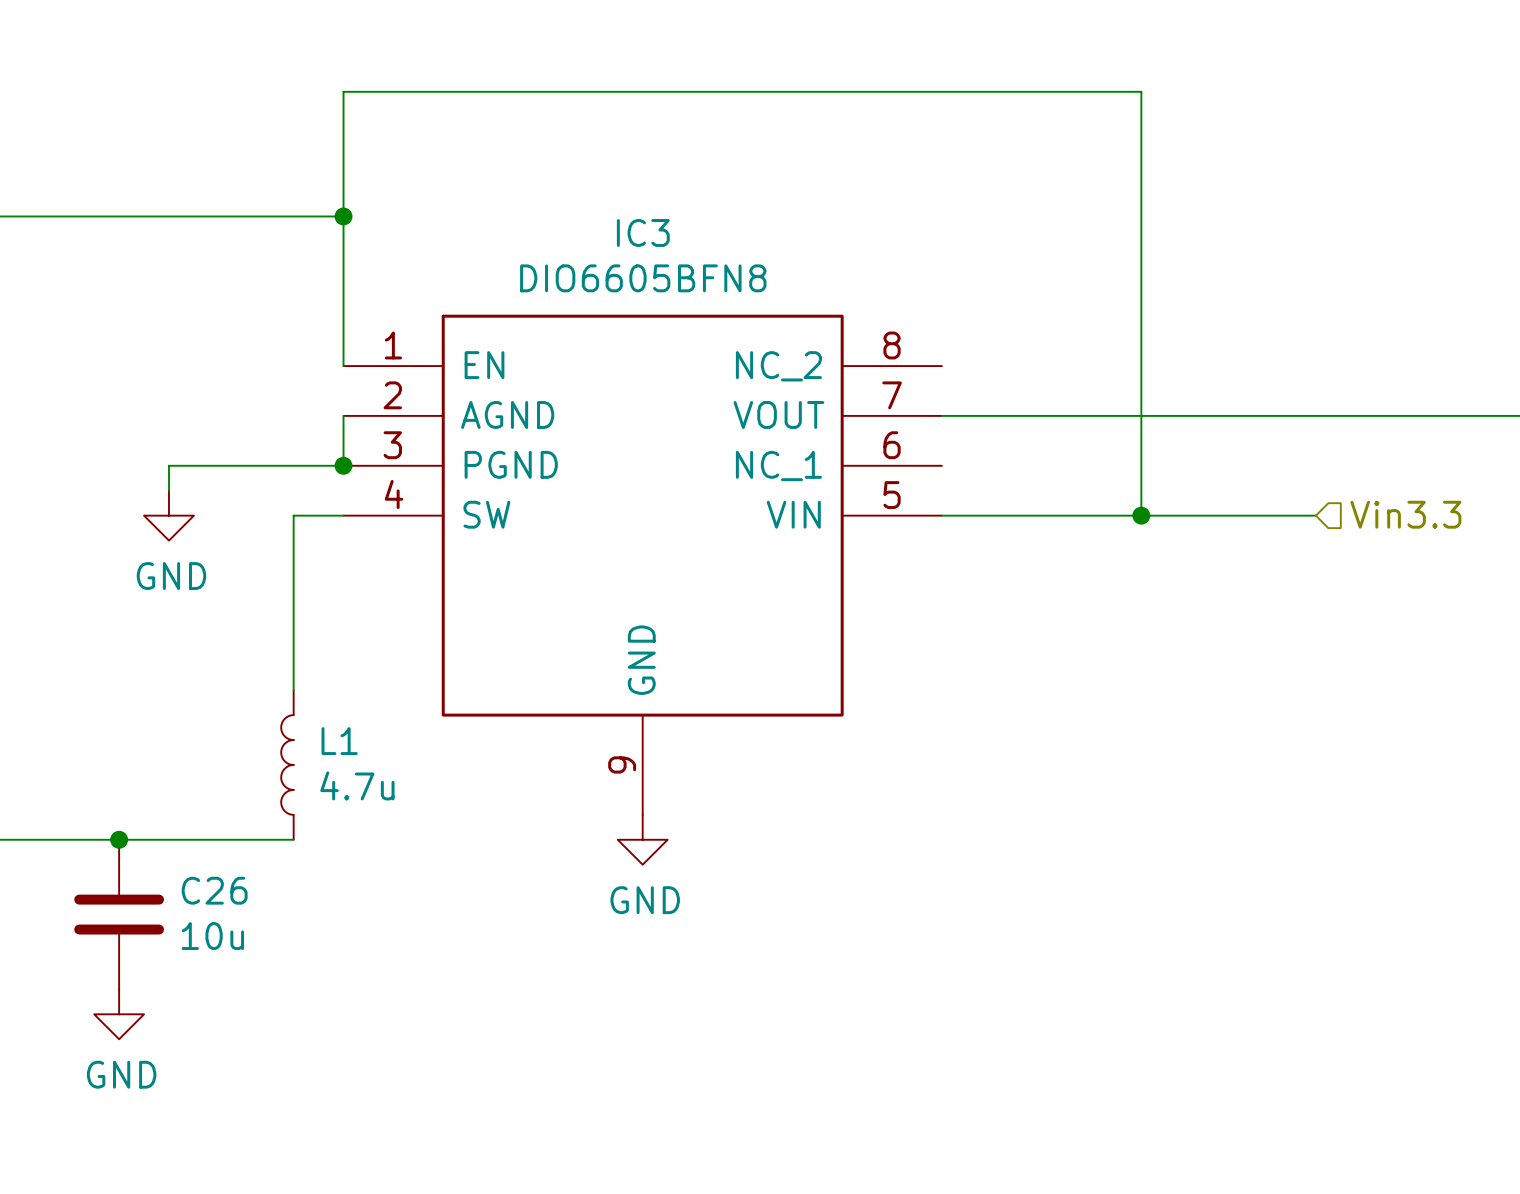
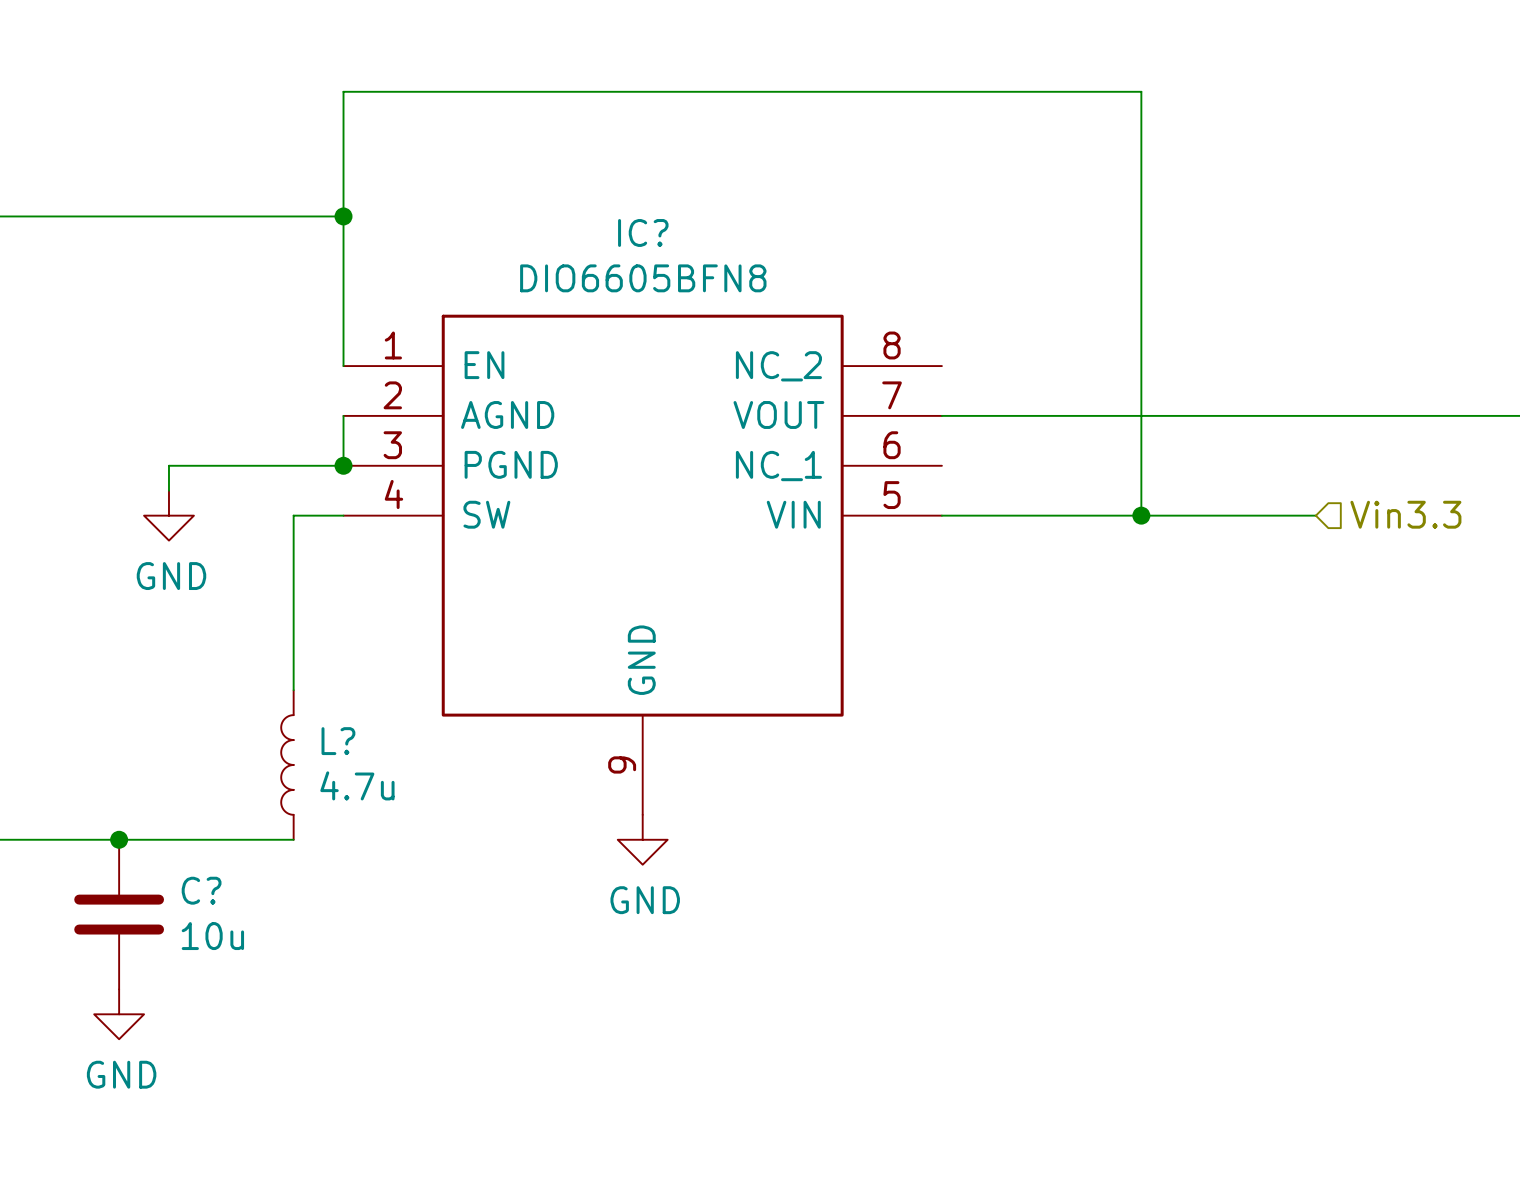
IC3 name: IC3 (643, 232) -> IC? (643, 232)
L1 name: L1 (339, 741) -> L? (338, 741)
C26 name: C26 (214, 890) -> C? (201, 890)

